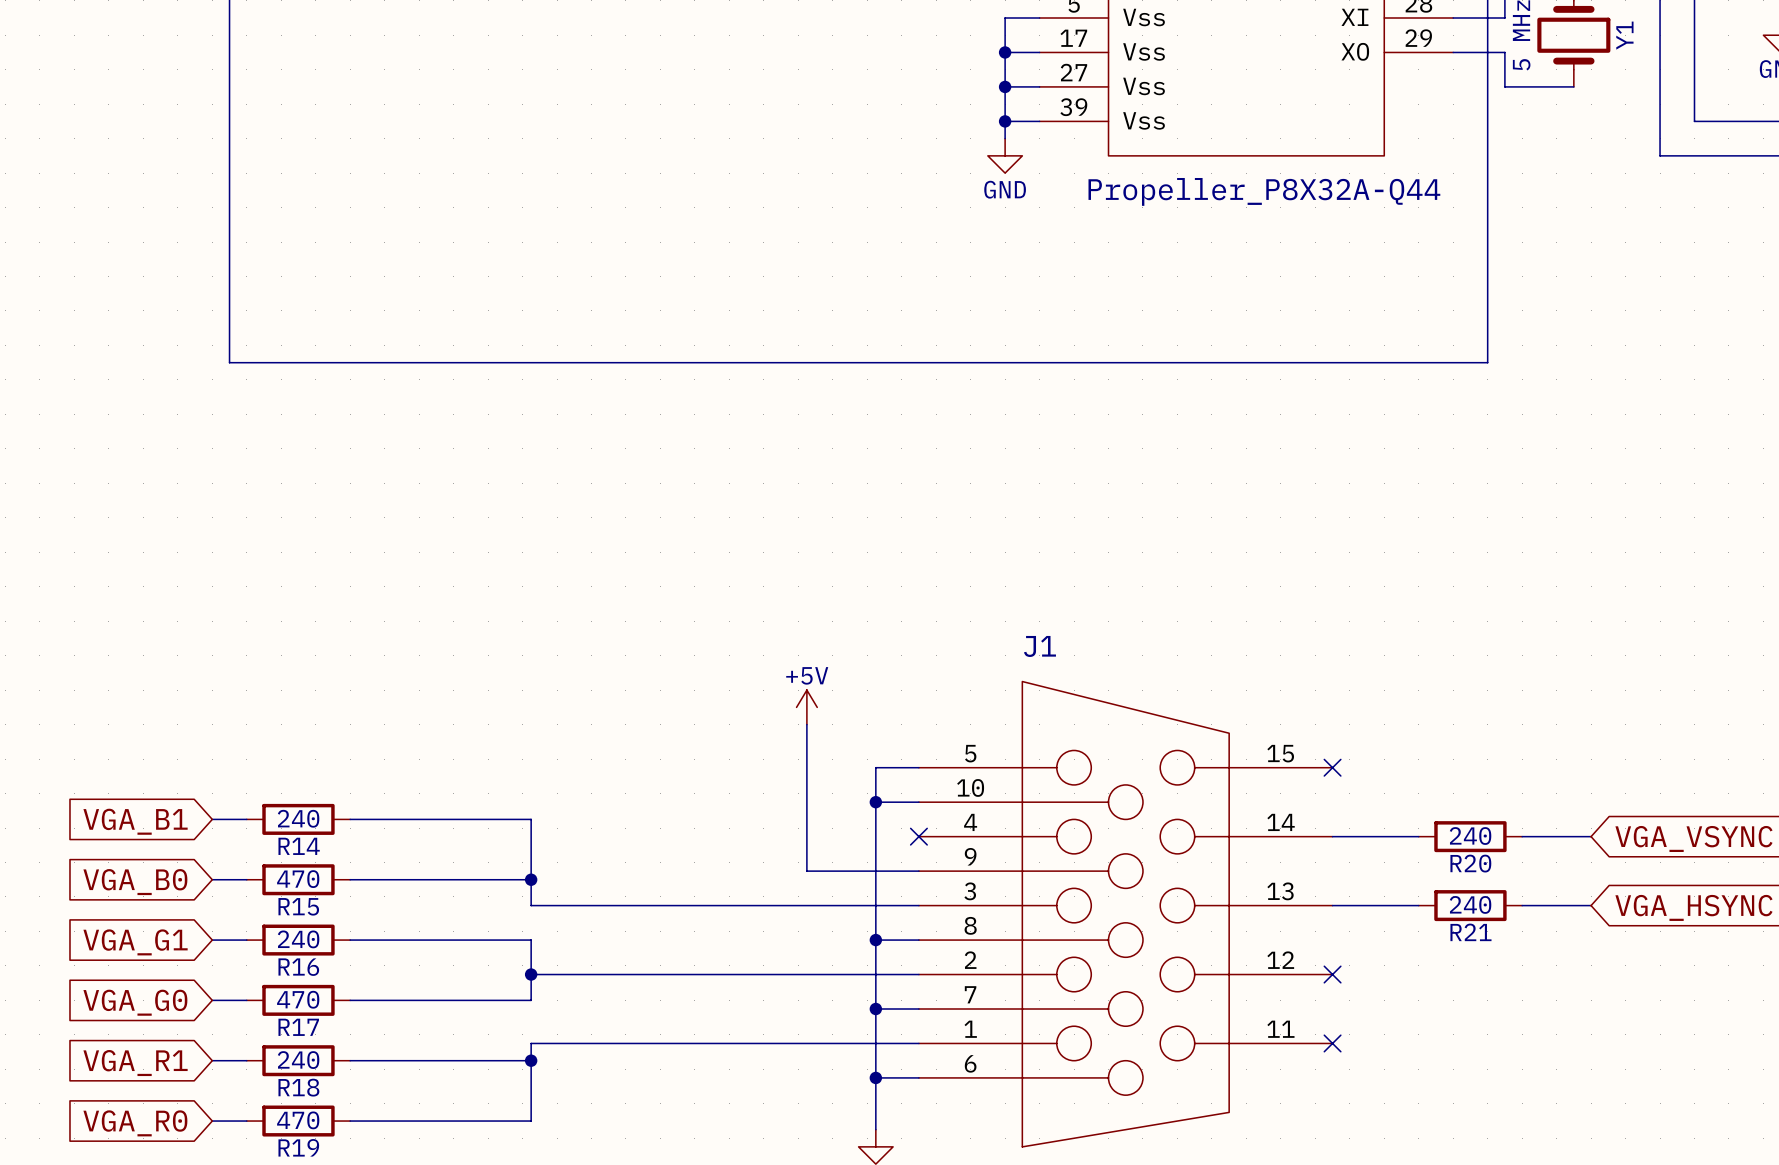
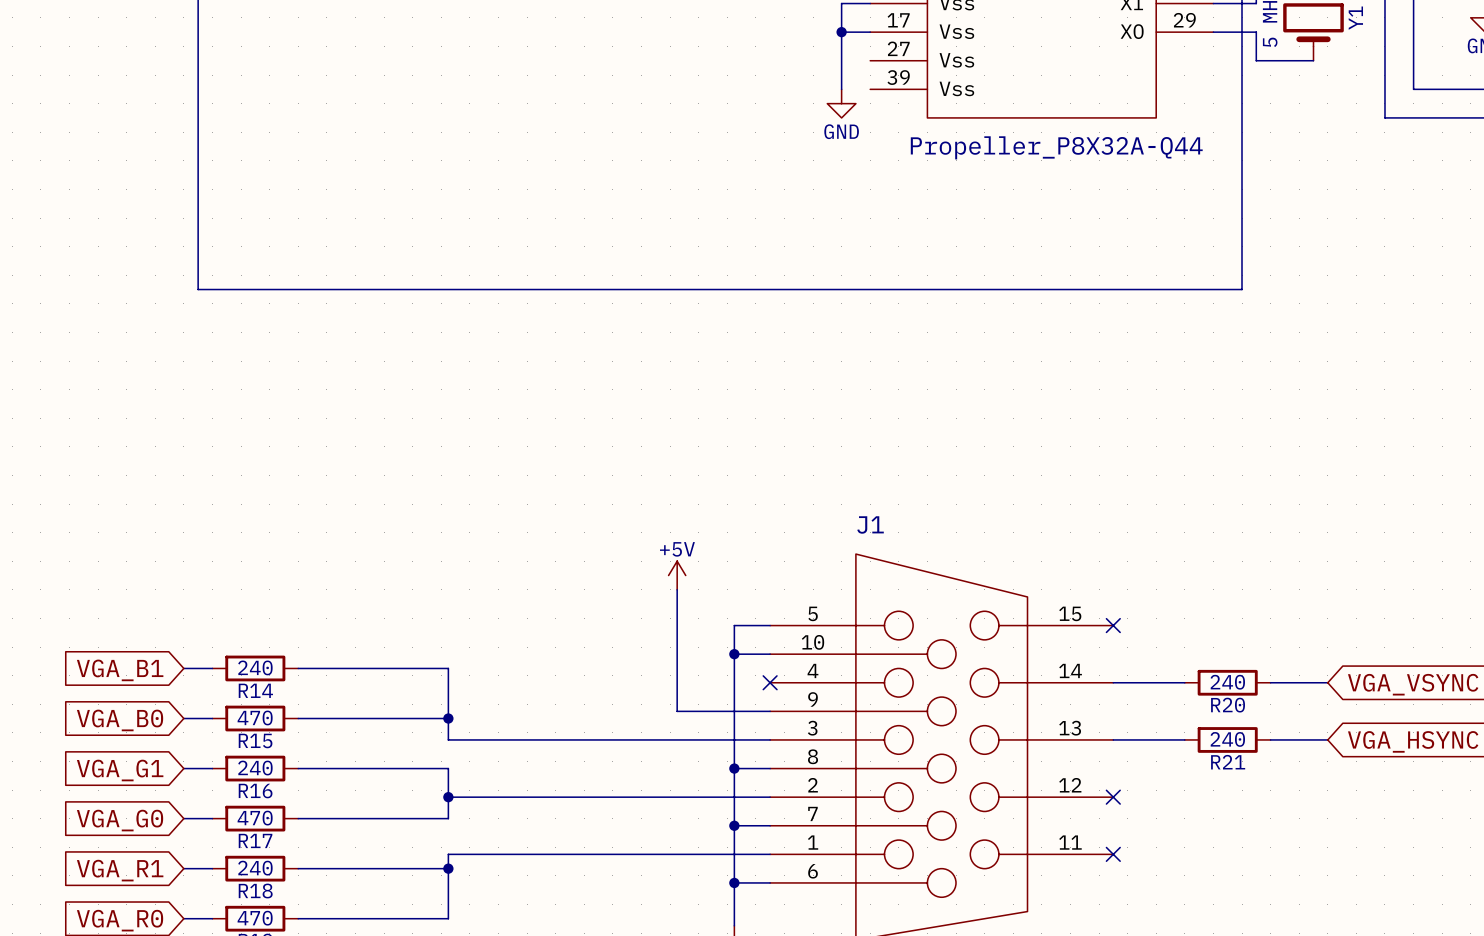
wire: (1005, 86) (1039, 86) -> none
junction: (1005, 86) -> none
junction: (1005, 121) -> none
wire: (1039, 121) (1005, 121) (1005, 138) -> none
power symbol position: GND (1005, 155) -> GND (841, 103)

